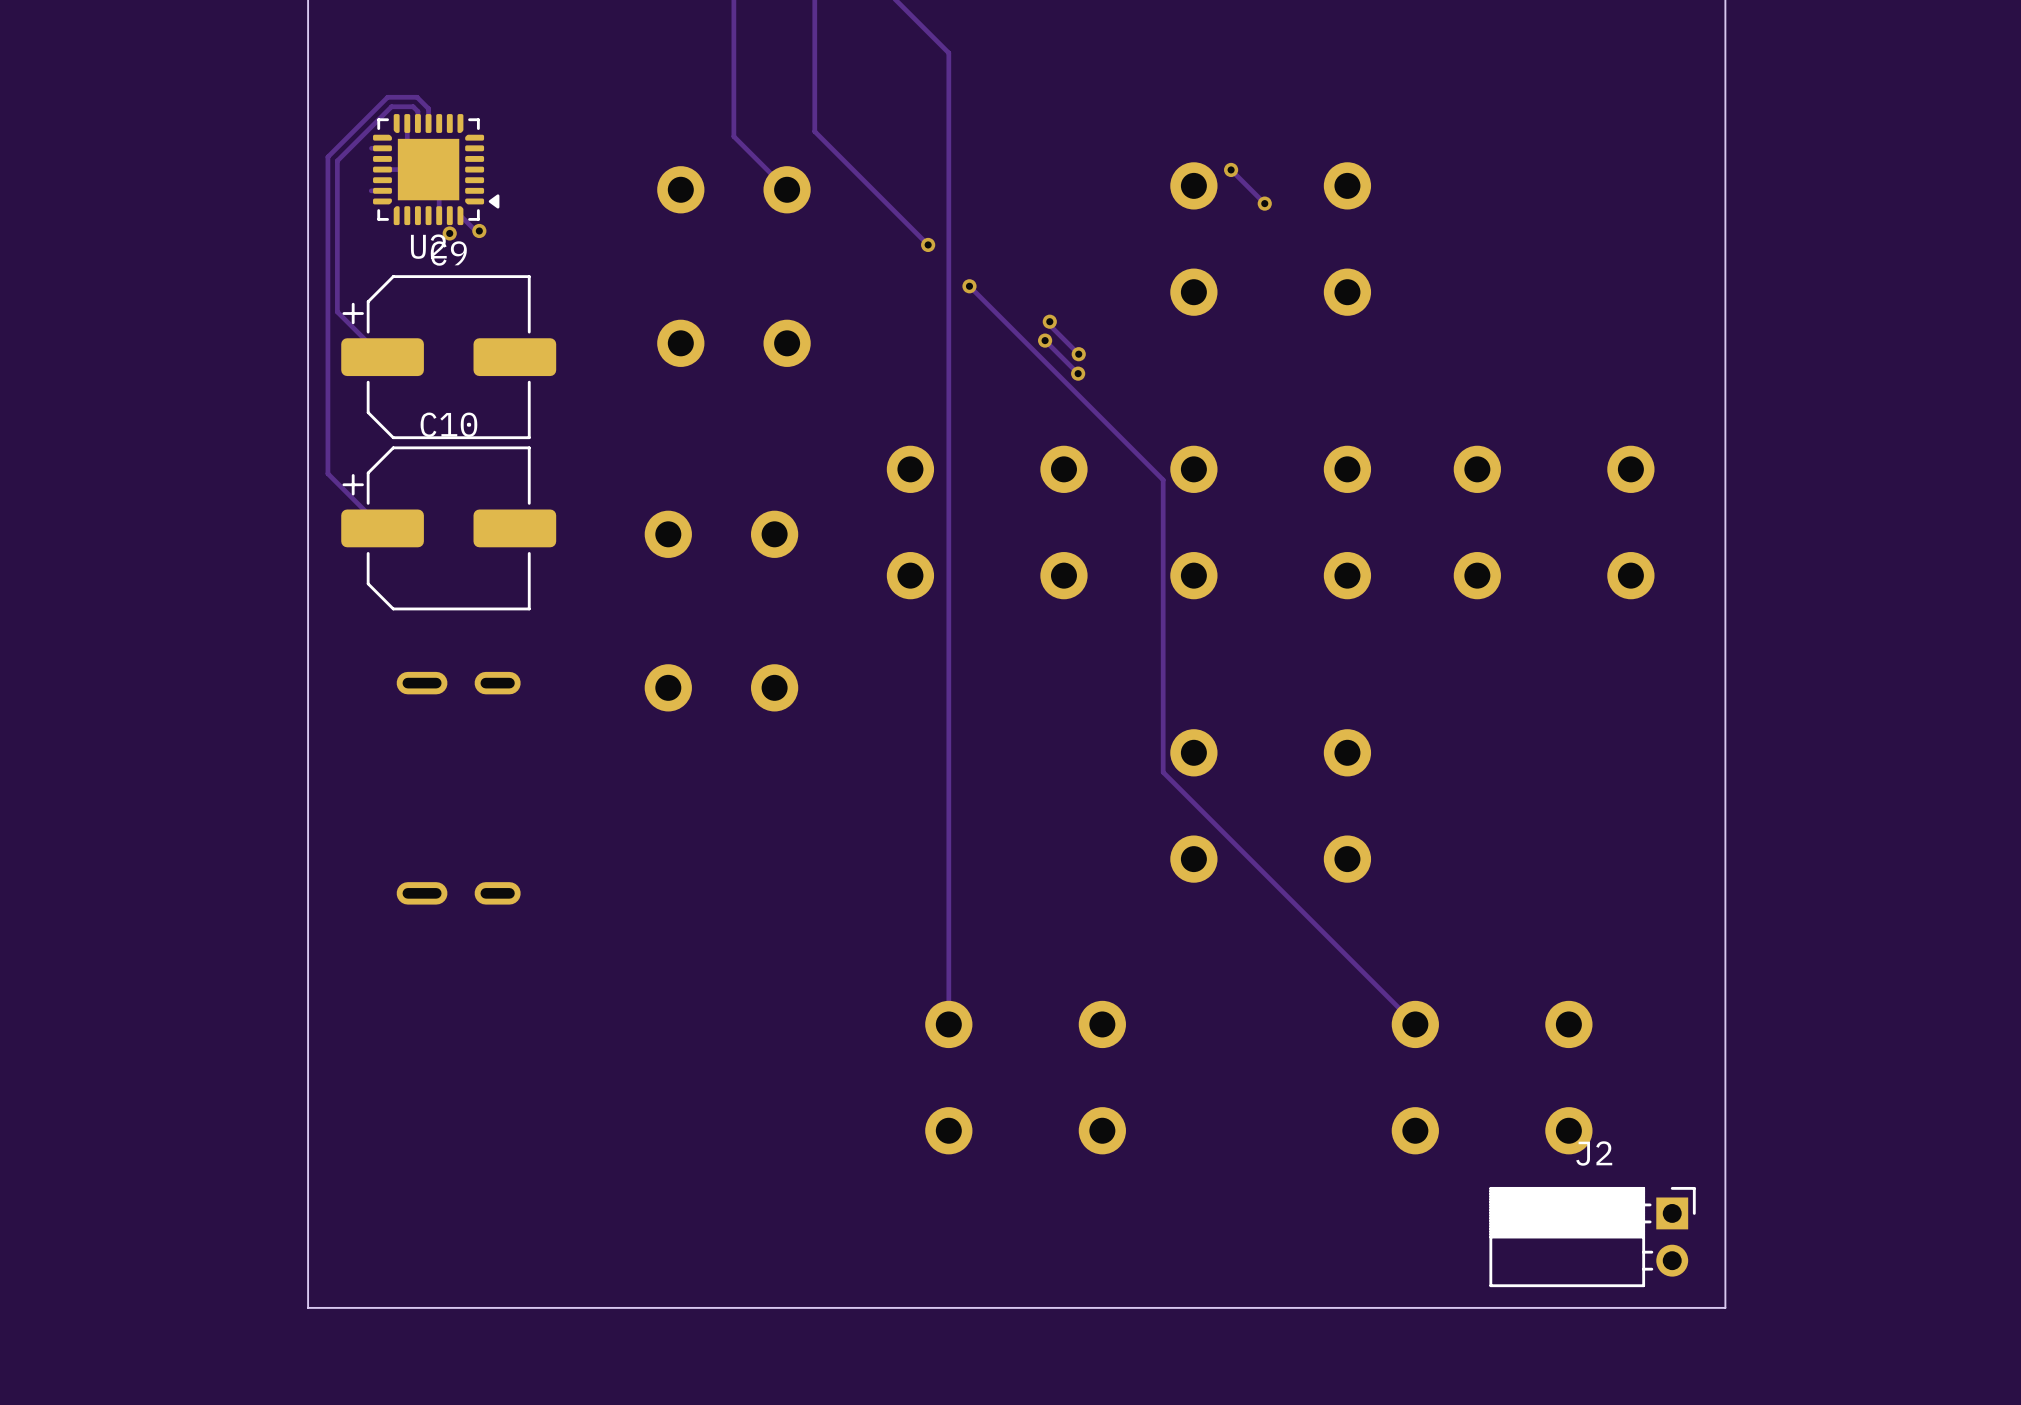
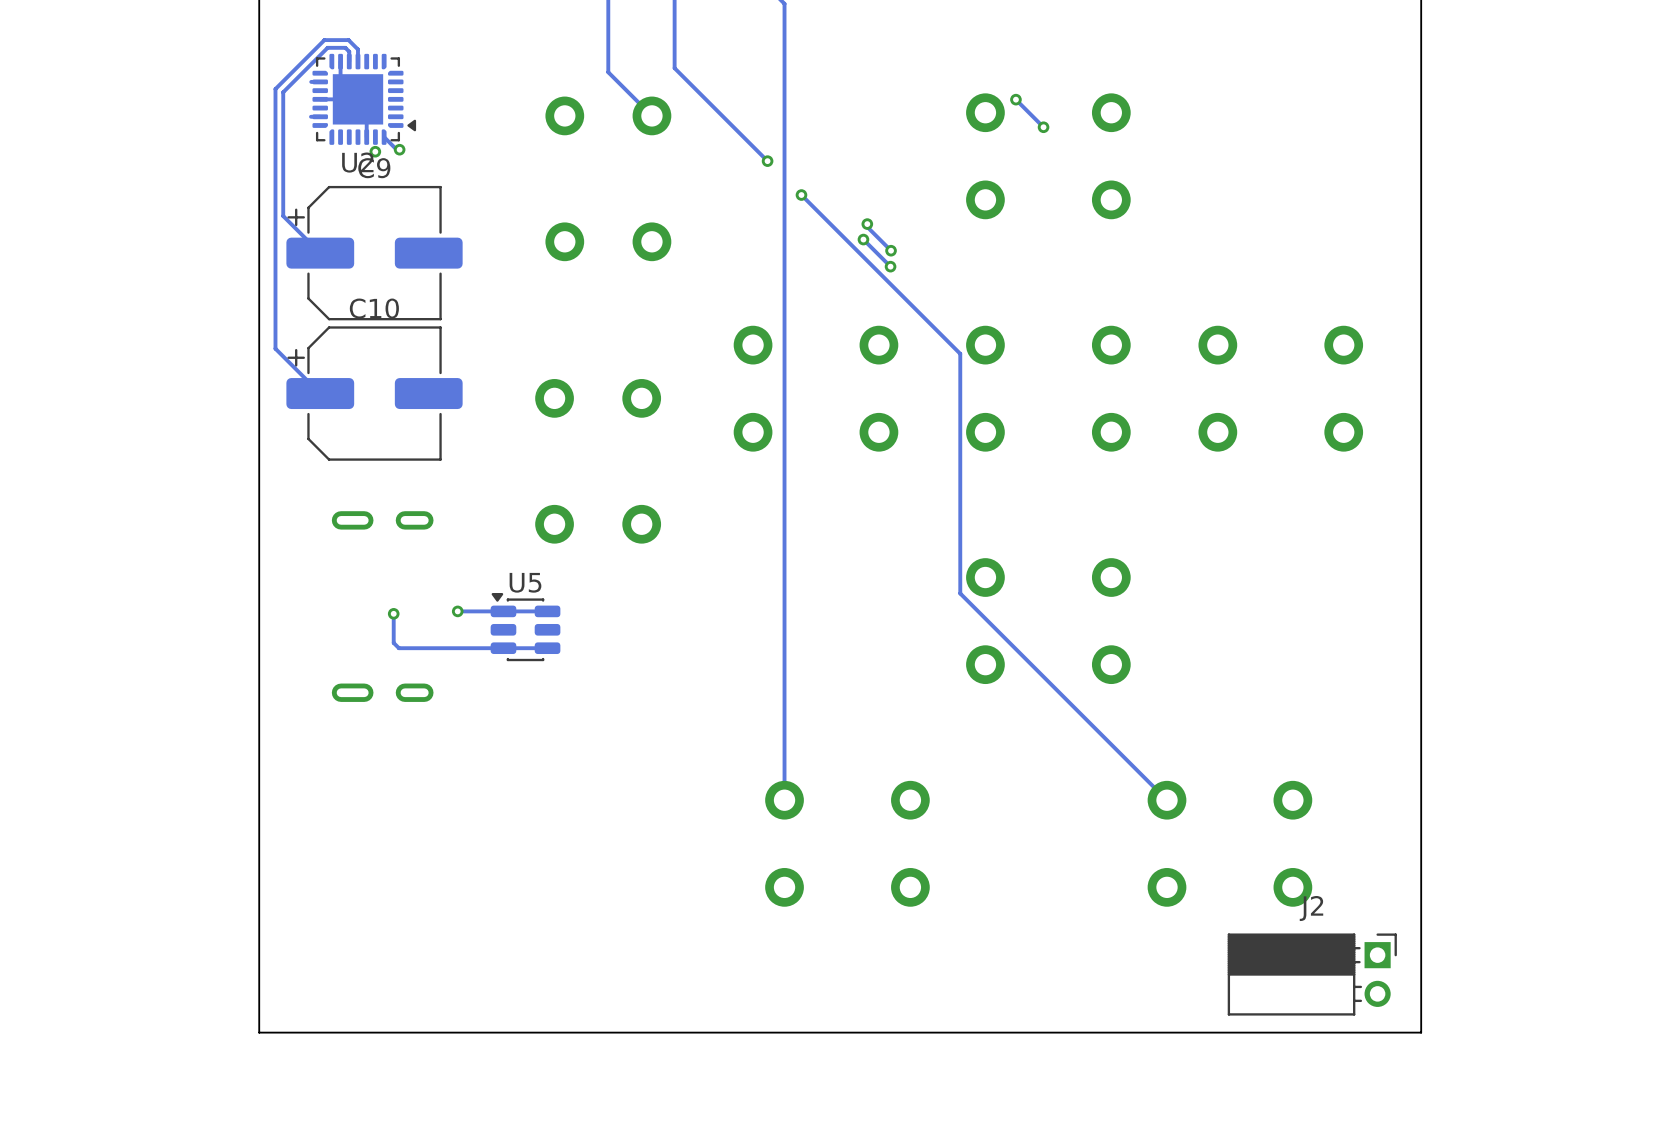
via: none -> (457, 611)
track: none -> (547, 611) (457, 611)
track: none -> (393, 613) (393, 642) (398, 648) (547, 648)
via: none -> (393, 613)
U5: none -> (525, 627)

